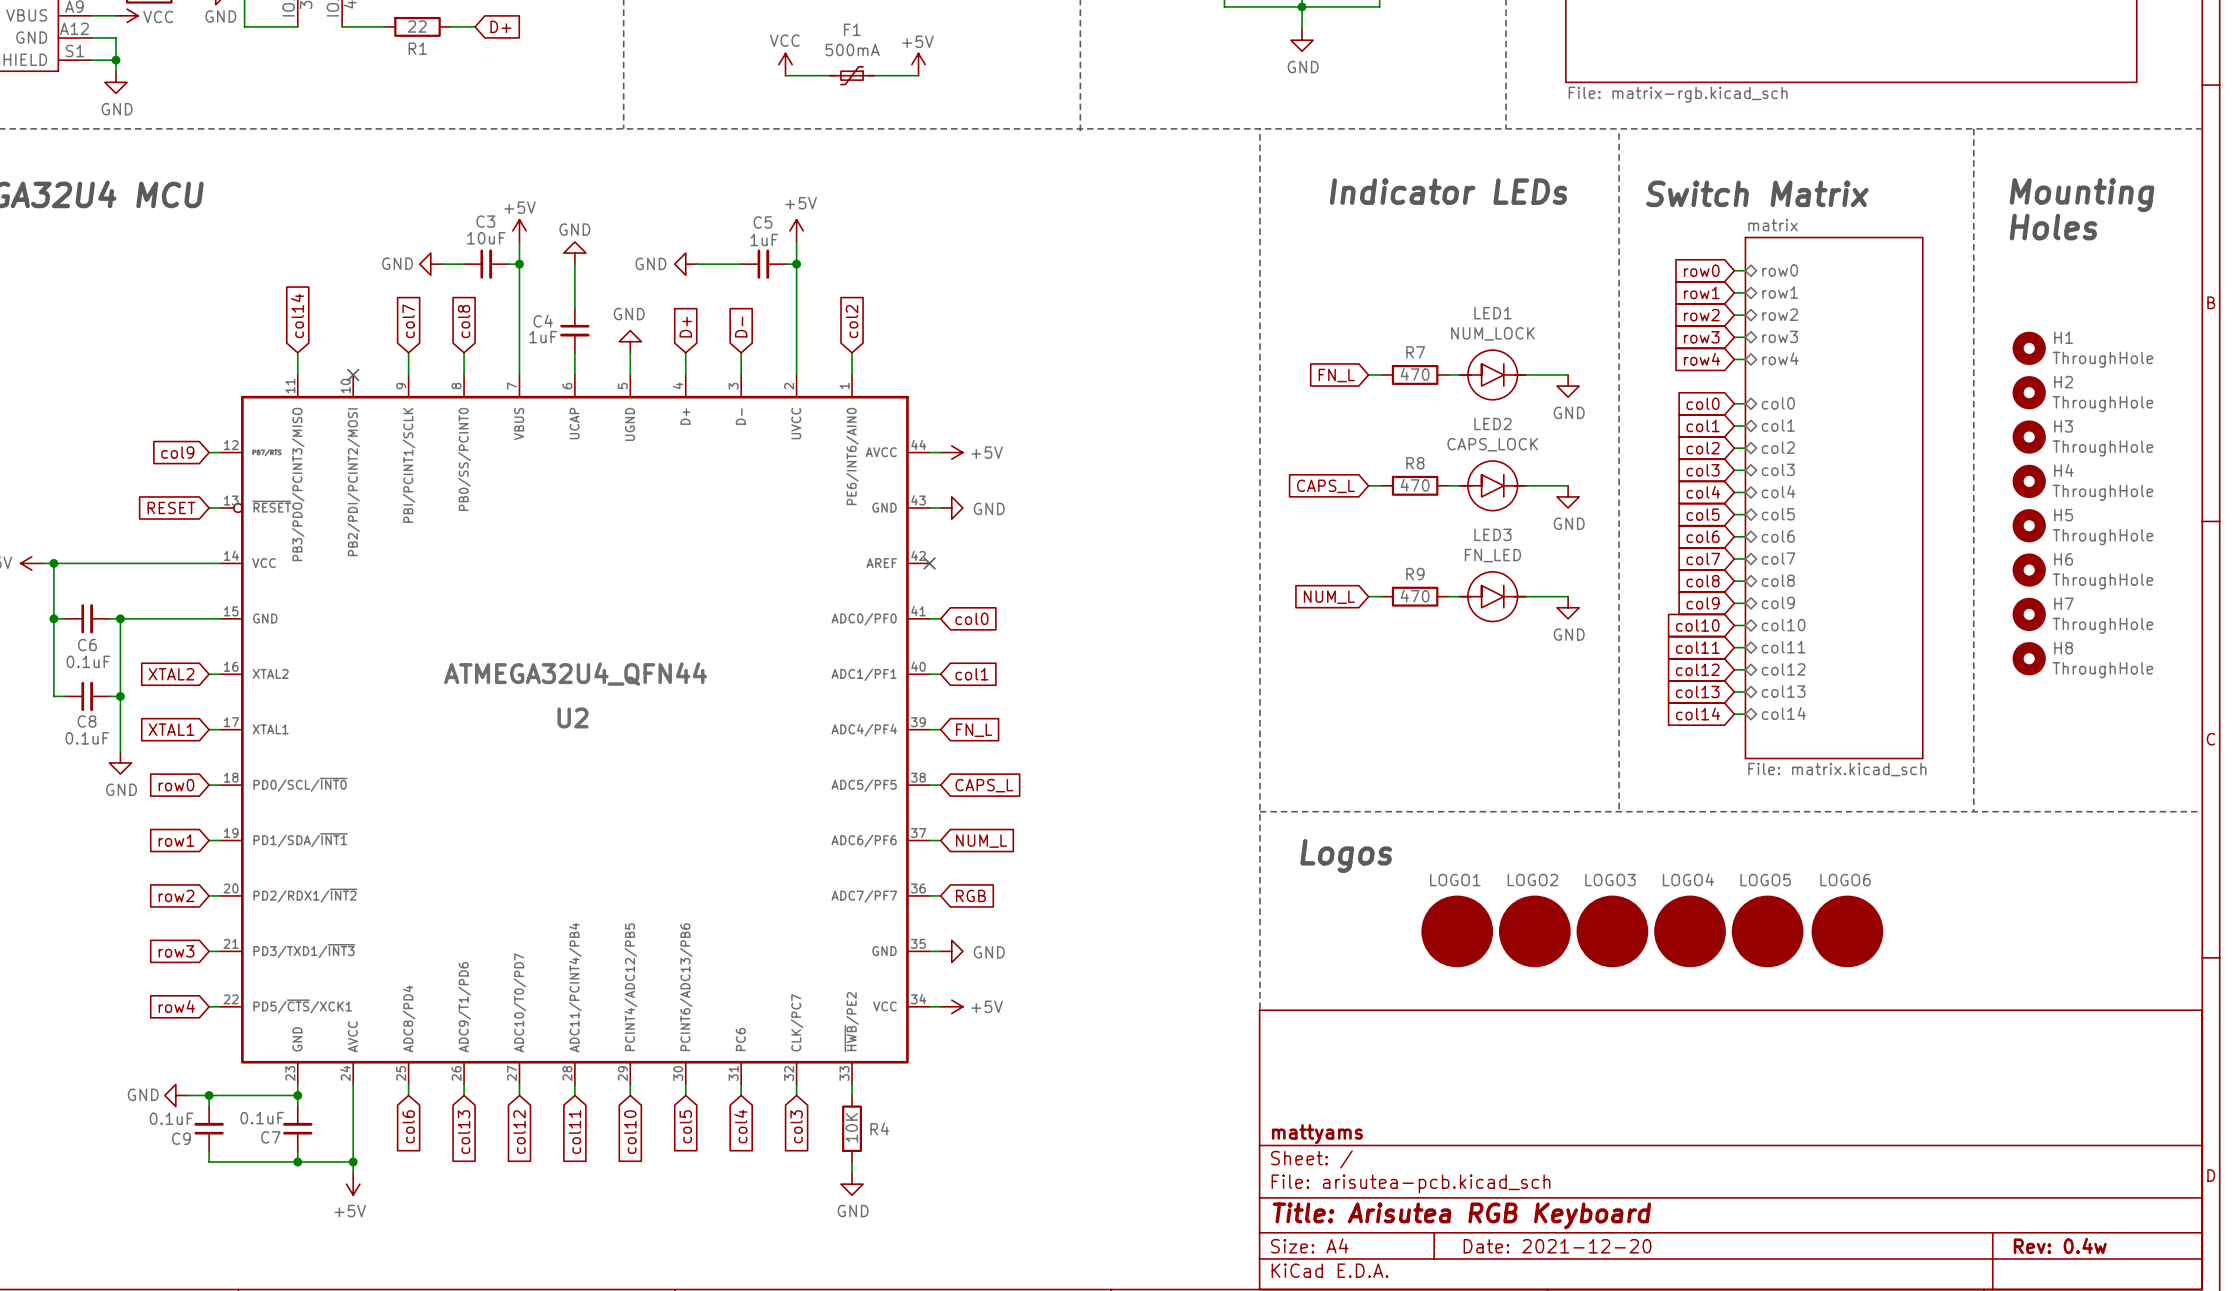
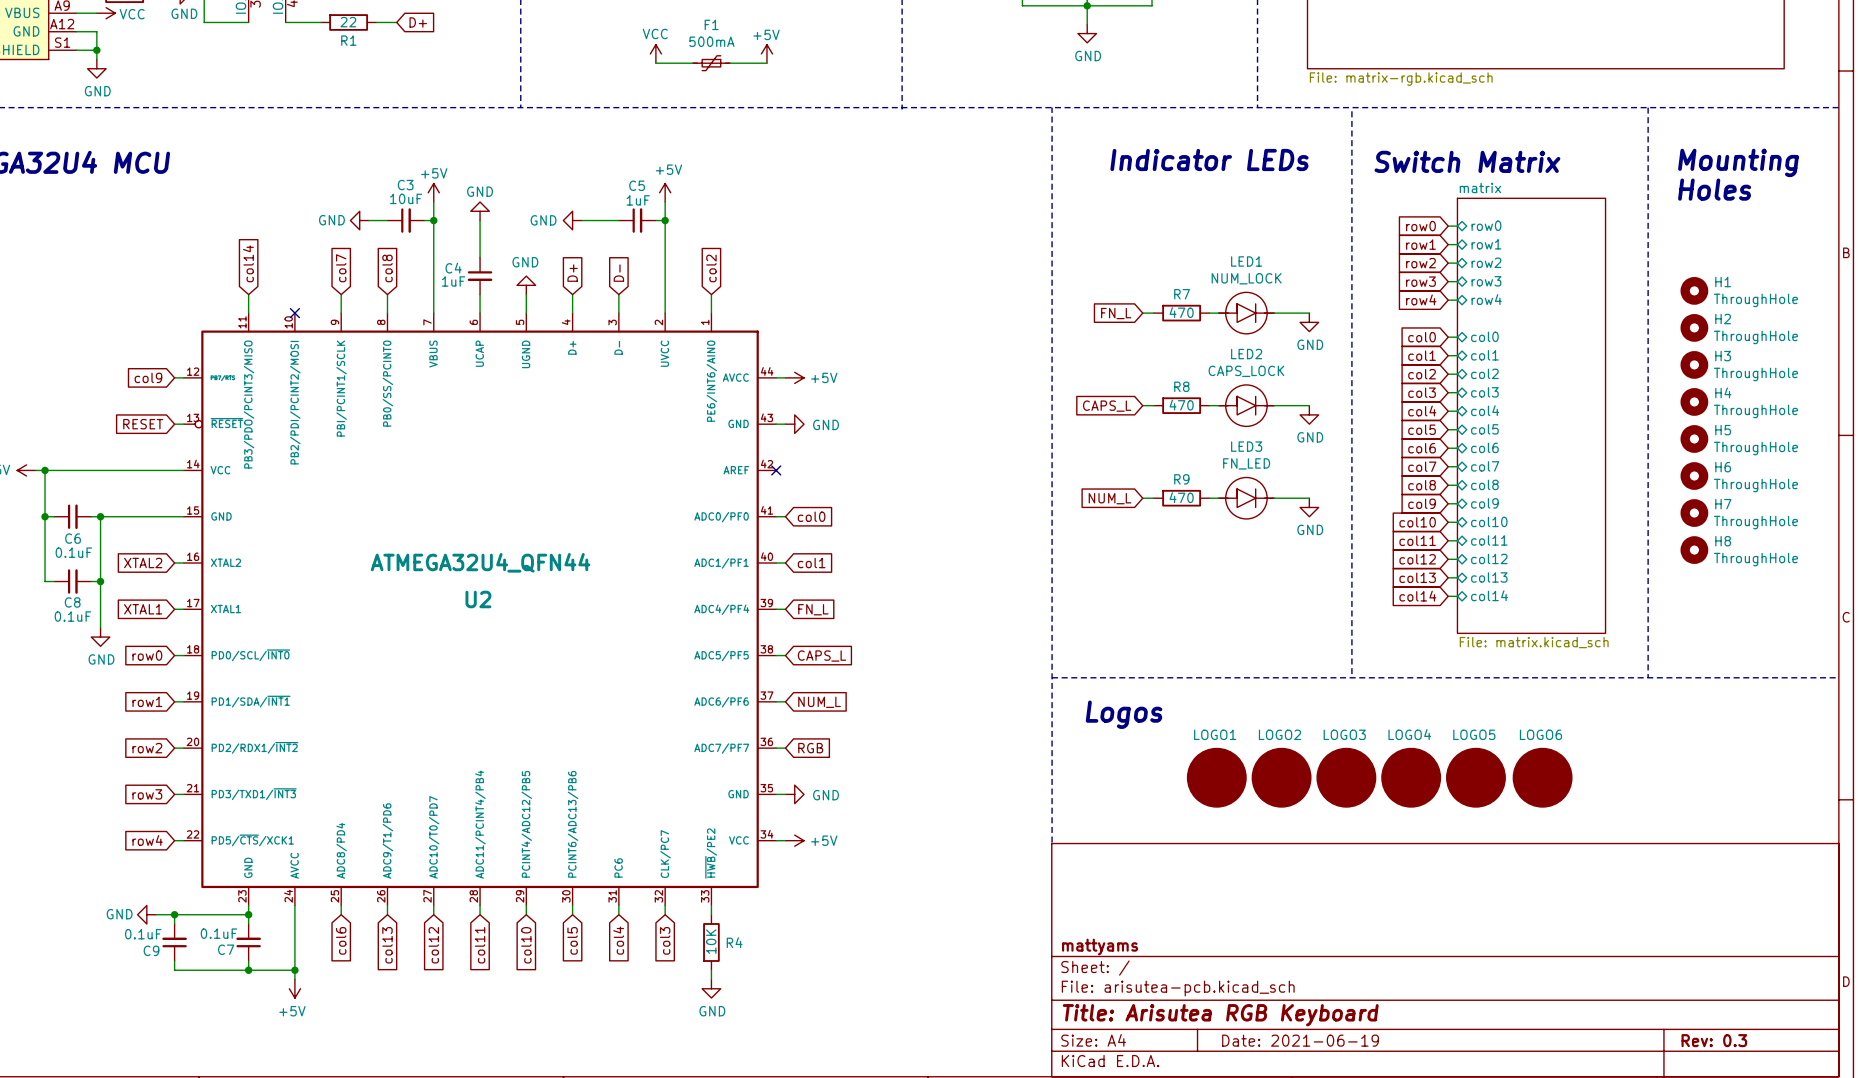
title block: Rev: 0.4w (2060, 1245) -> Rev: 0.3 (1714, 1040)
title block: Date: 2021-12-20 (1557, 1246) -> Date: 2021-06-19 (1300, 1040)

